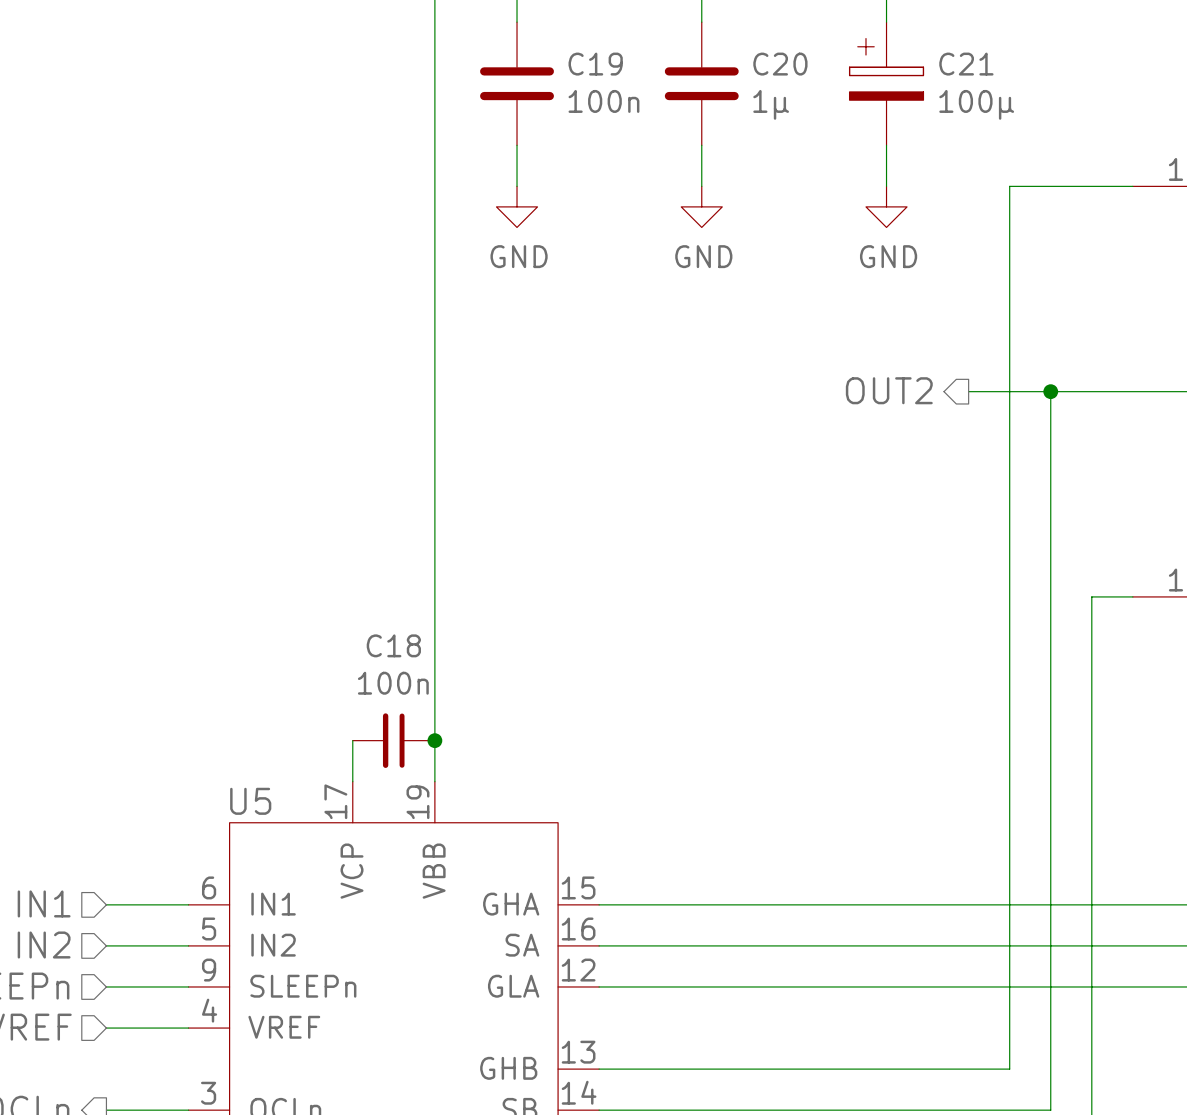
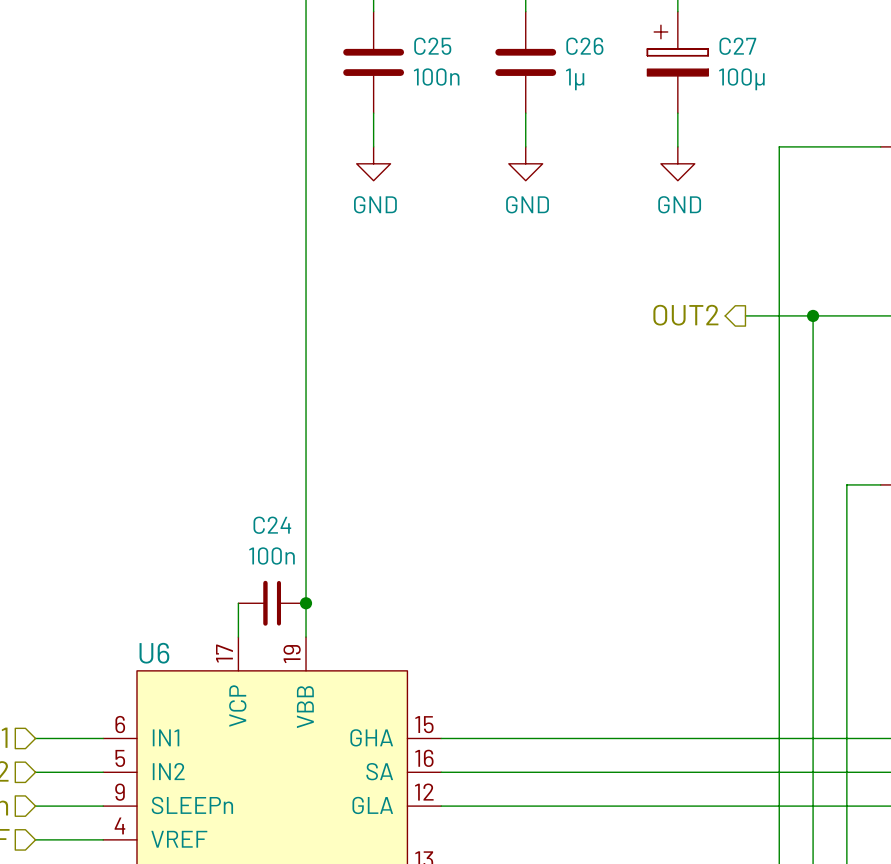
C19 name: C19 (595, 64) -> C25 (432, 46)
C20 name: C20 (780, 64) -> C26 (584, 46)
C21 name: C21 (966, 64) -> C27 (737, 46)
C18 name: C18 (393, 645) -> C24 (272, 525)
U5 name: U5 (250, 801) -> U6 (154, 653)

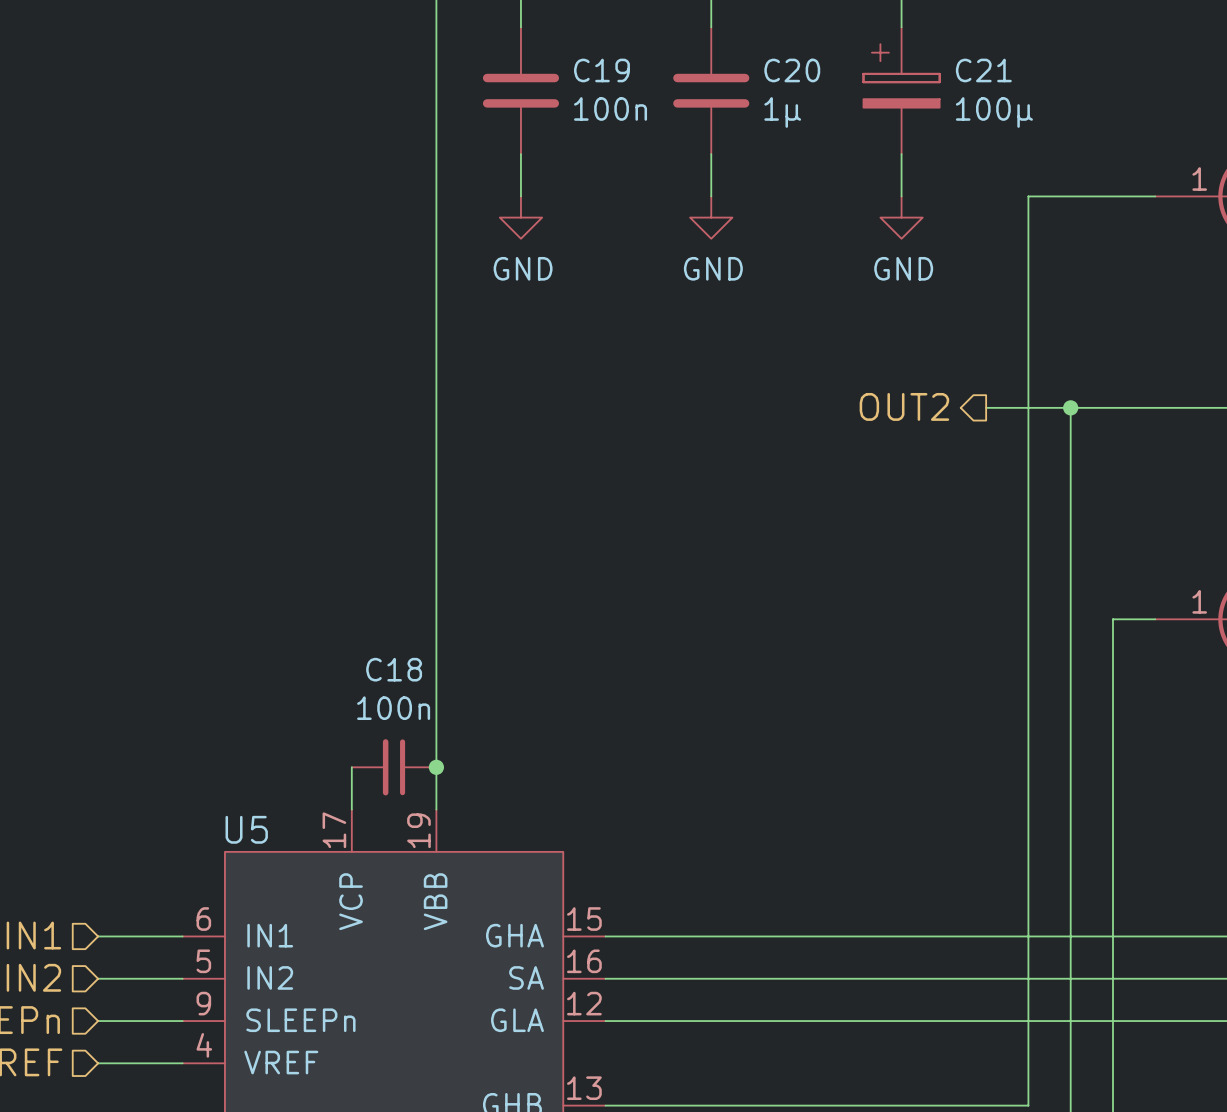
C25 name: C25 (432, 46) -> C19 (601, 70)
C26 name: C26 (584, 46) -> C20 (792, 70)
C27 name: C27 (737, 46) -> C21 (983, 70)
C24 name: C24 (272, 525) -> C18 (394, 669)
U6 name: U6 (154, 653) -> U5 (246, 829)

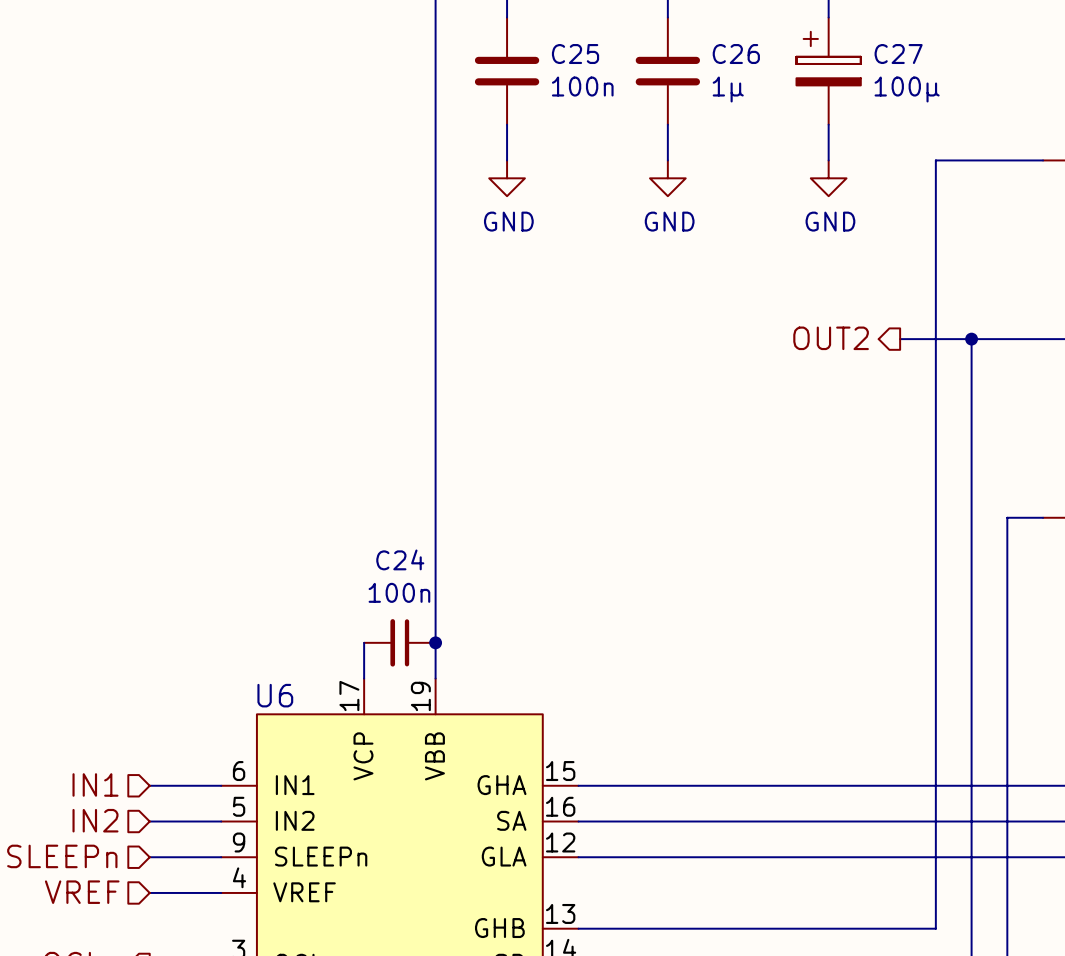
C19 name: C19 (601, 70) -> C25 (575, 54)
C20 name: C20 (792, 70) -> C26 (736, 54)
C21 name: C21 (983, 70) -> C27 (898, 54)
C18 name: C18 (394, 669) -> C24 (400, 559)
U5 name: U5 (246, 829) -> U6 (275, 695)

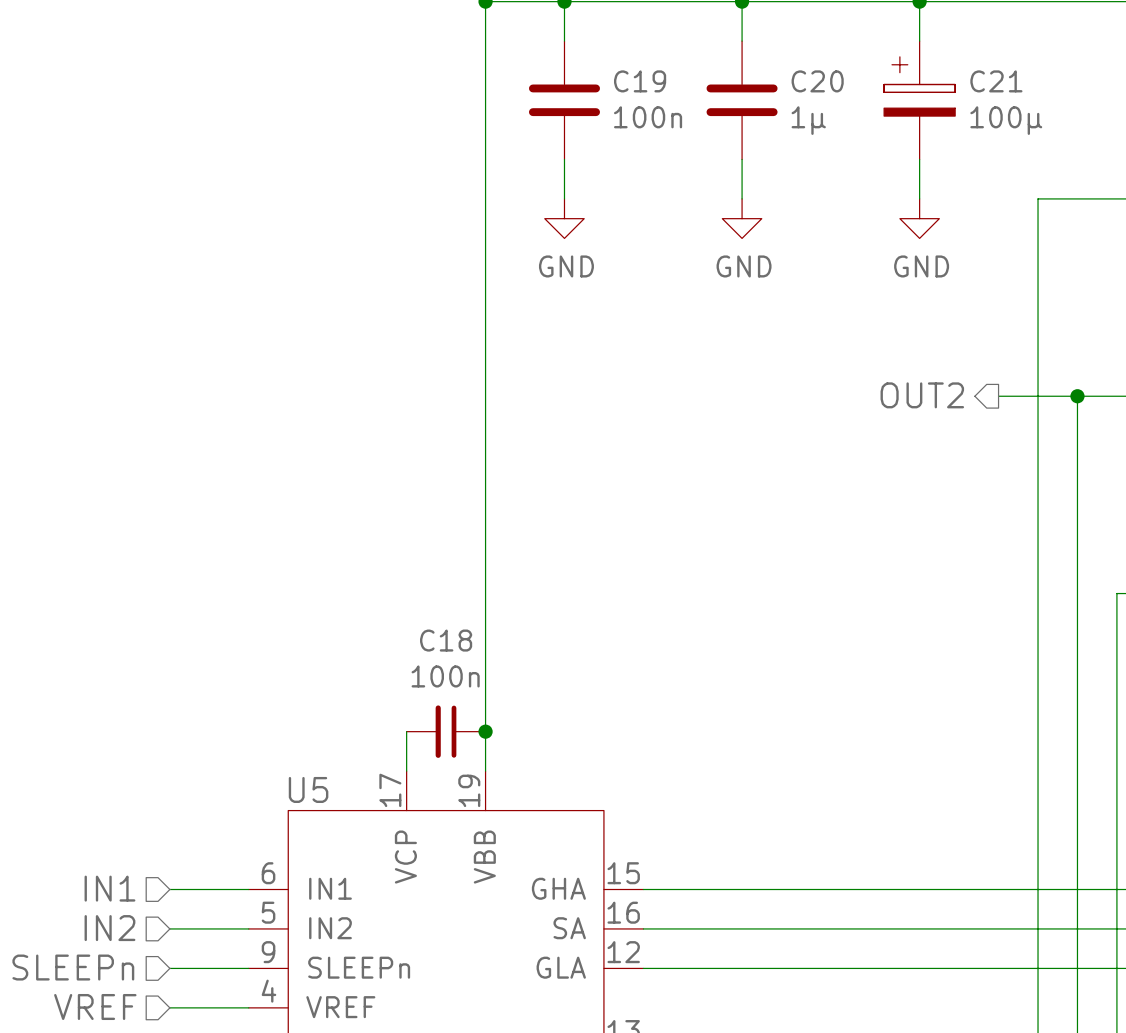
C25 name: C25 (575, 54) -> C19 (640, 81)
C26 name: C26 (736, 54) -> C20 (817, 81)
C27 name: C27 (898, 54) -> C21 (996, 81)
C24 name: C24 (400, 559) -> C18 (446, 640)
U6 name: U6 (275, 695) -> U5 (308, 789)

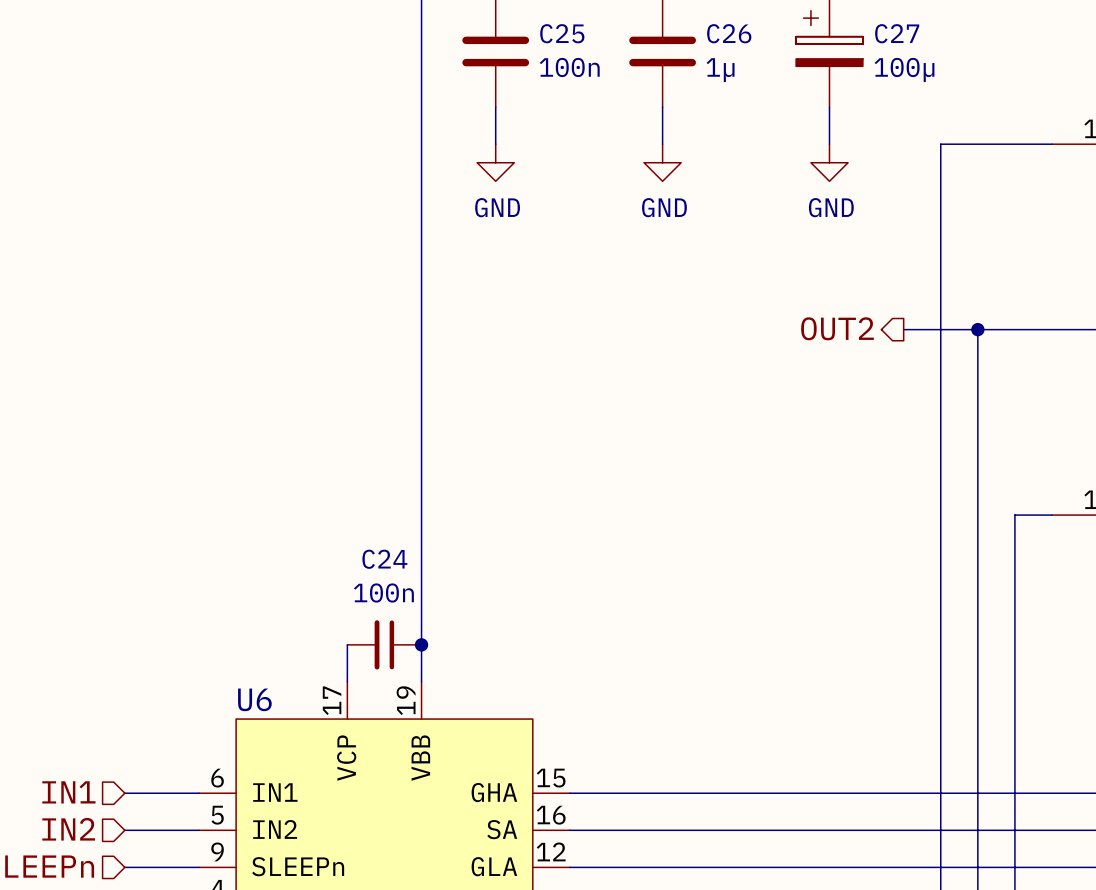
C19 name: C19 (640, 81) -> C25 (562, 33)
C20 name: C20 (817, 81) -> C26 (729, 33)
C21 name: C21 (996, 81) -> C27 (897, 33)
C18 name: C18 (446, 640) -> C24 (384, 559)
U5 name: U5 (308, 789) -> U6 (254, 699)

